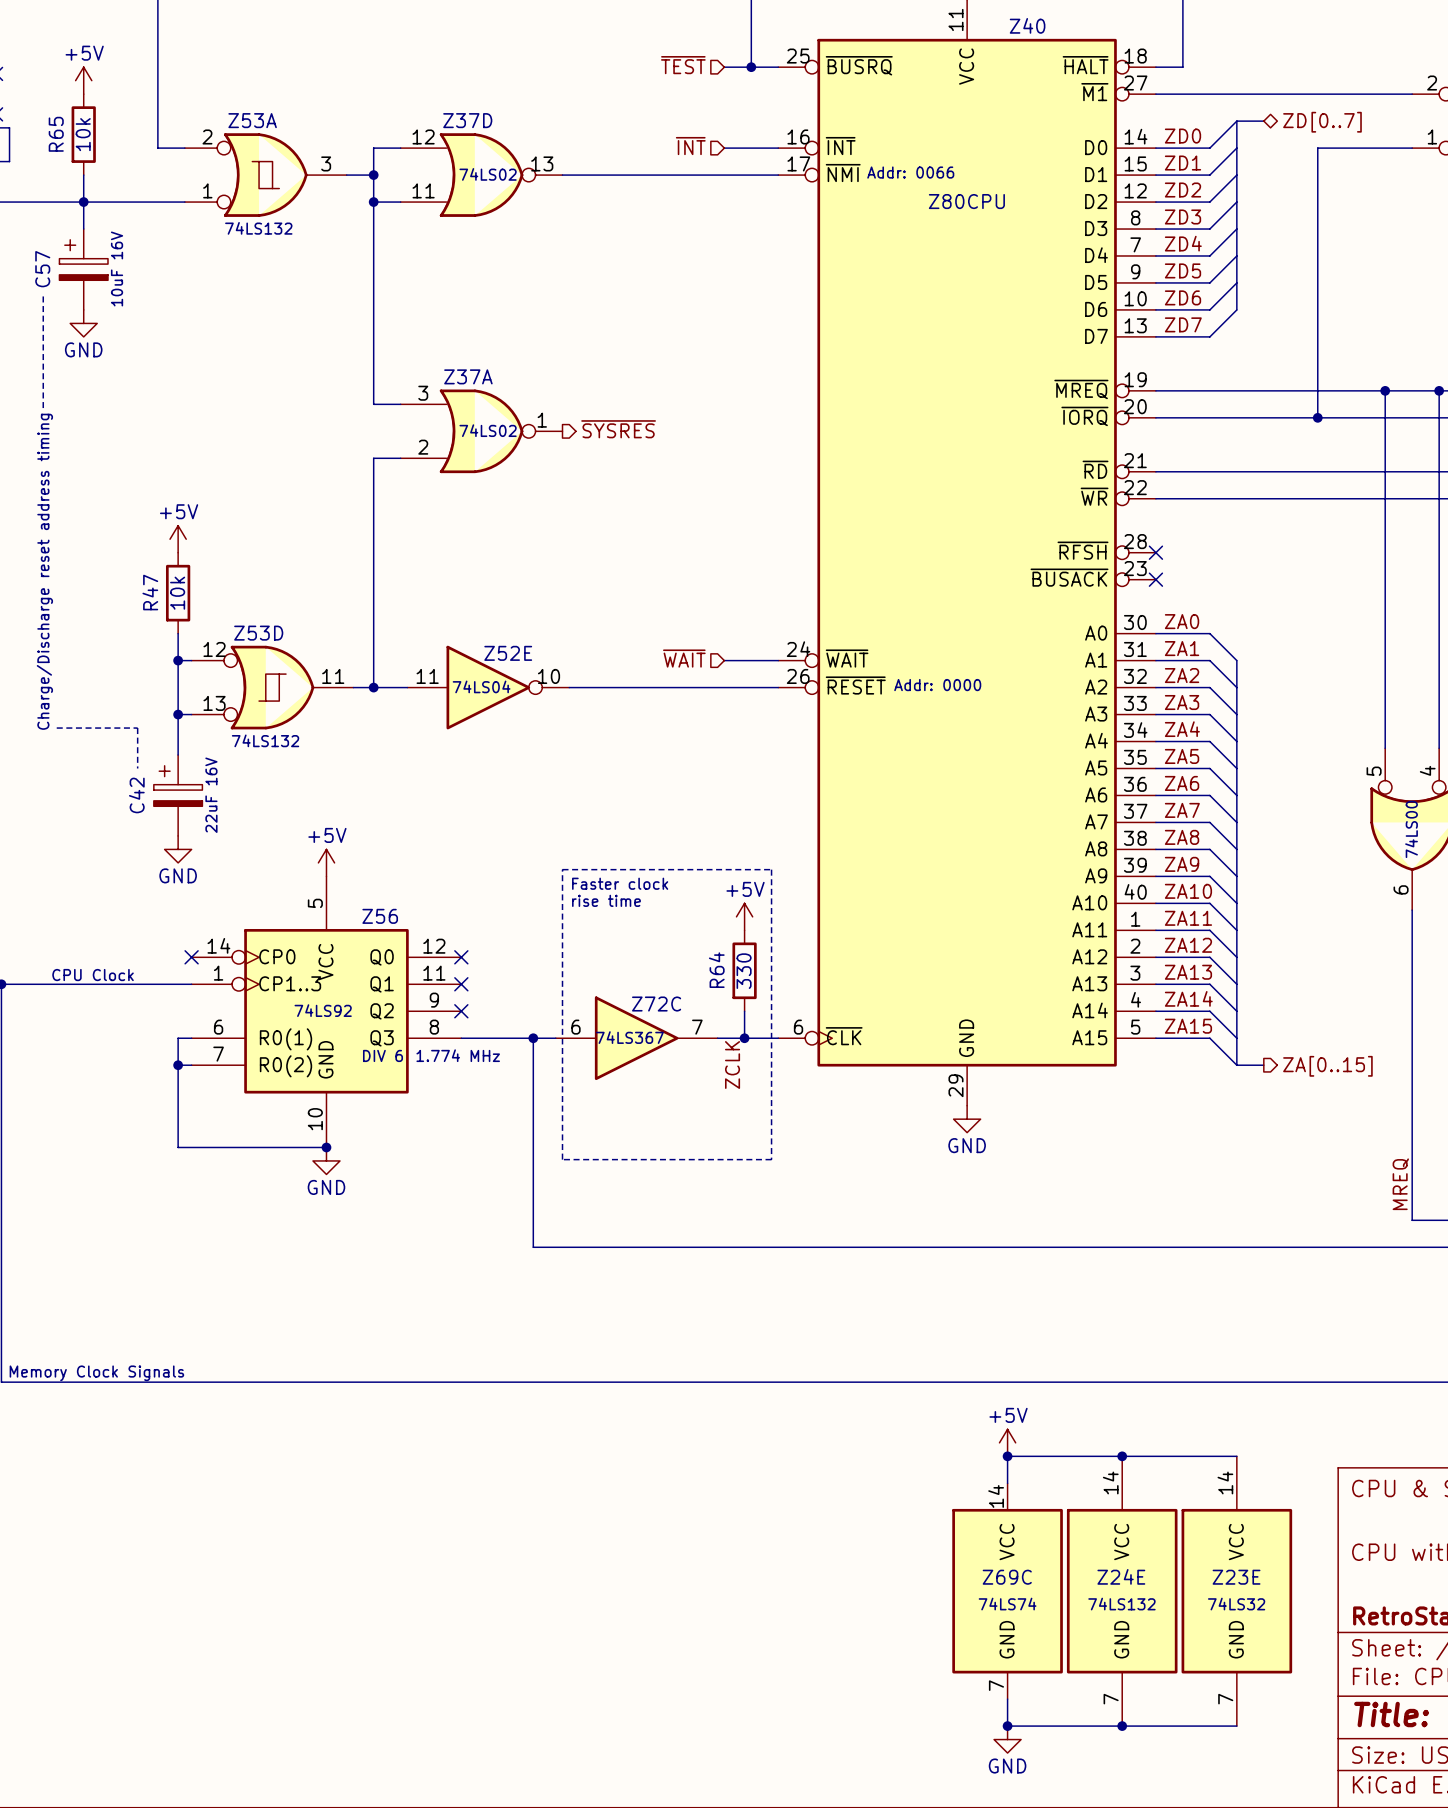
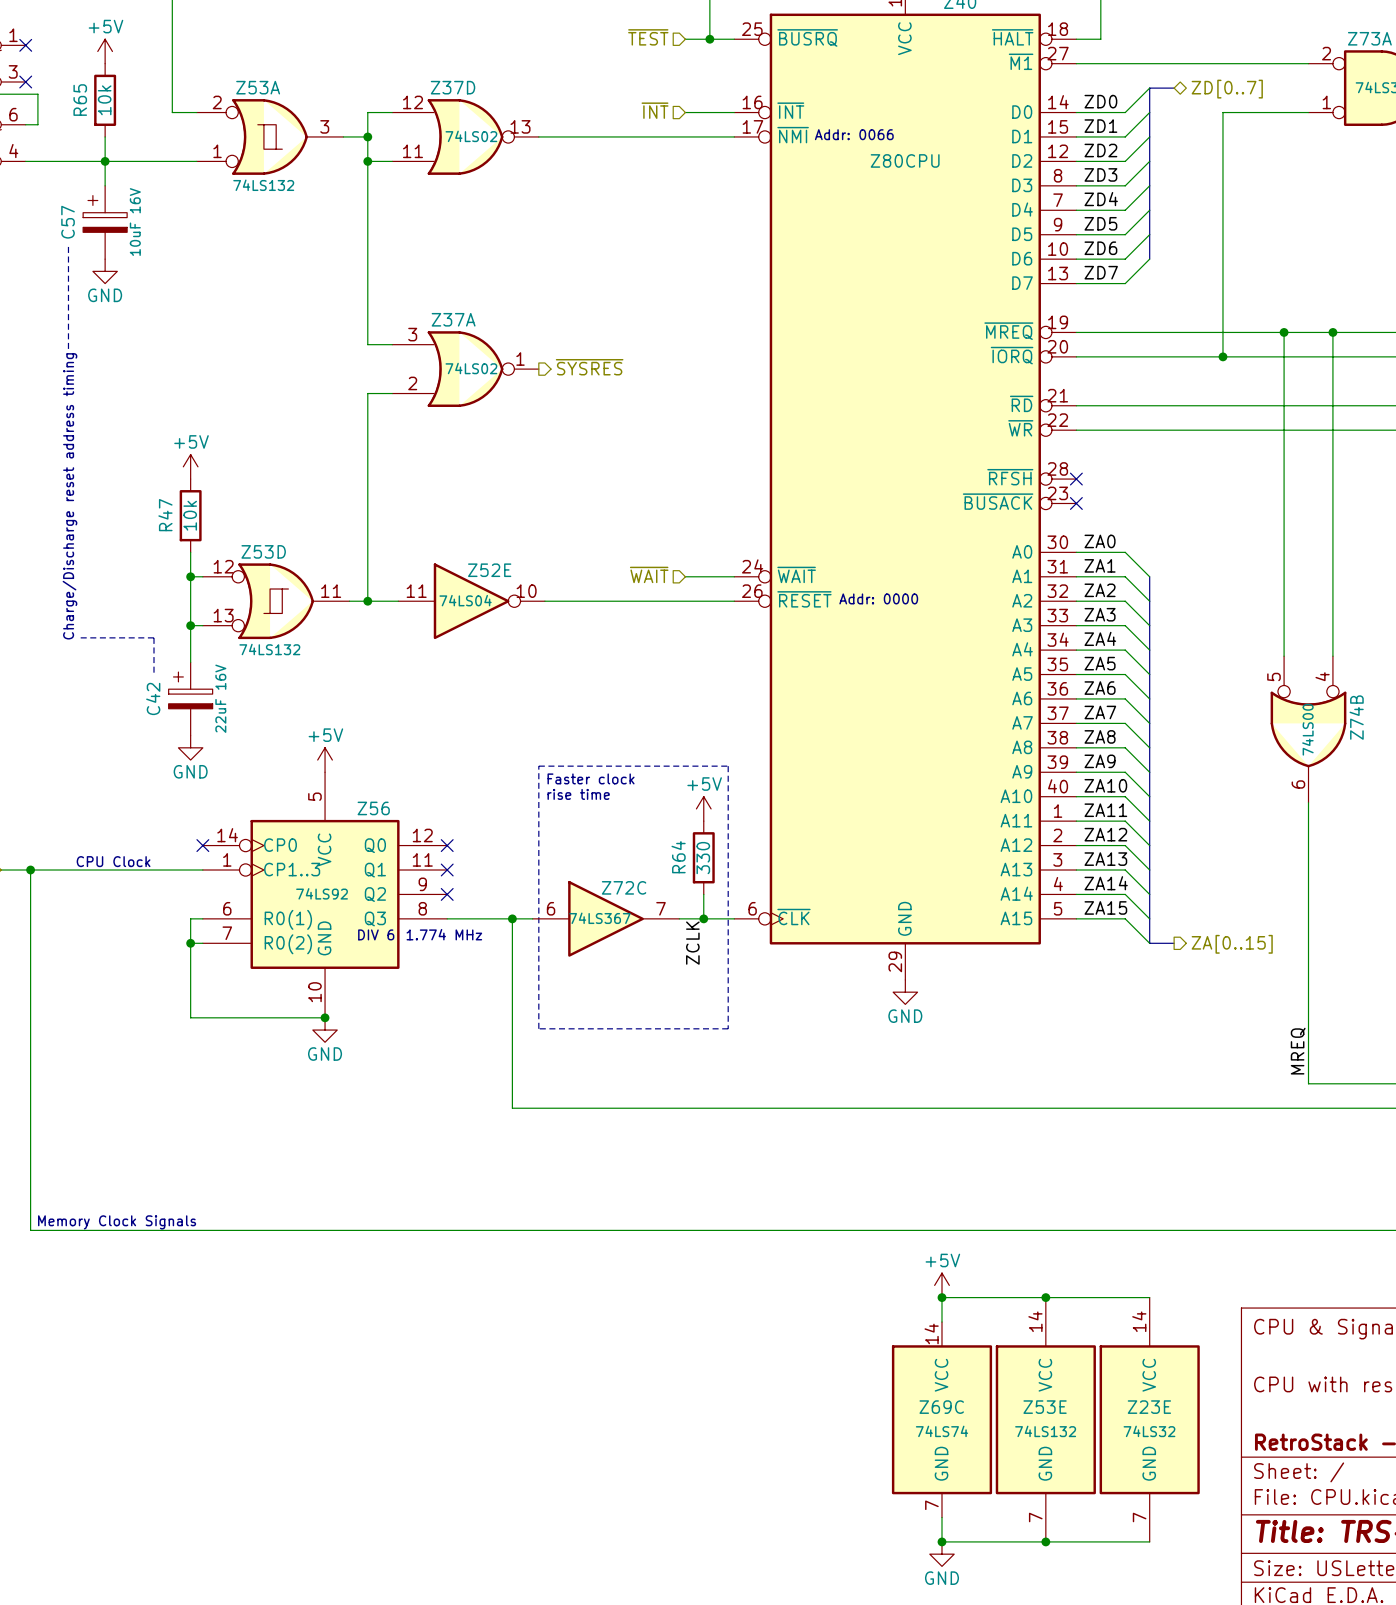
Z24E name: Z24E (1121, 1576) -> Z53E (1045, 1407)

